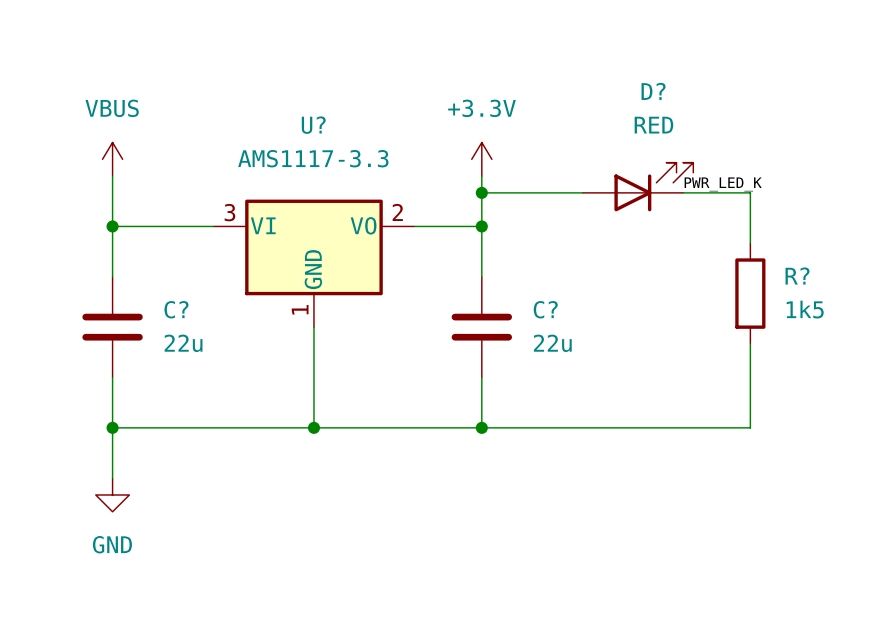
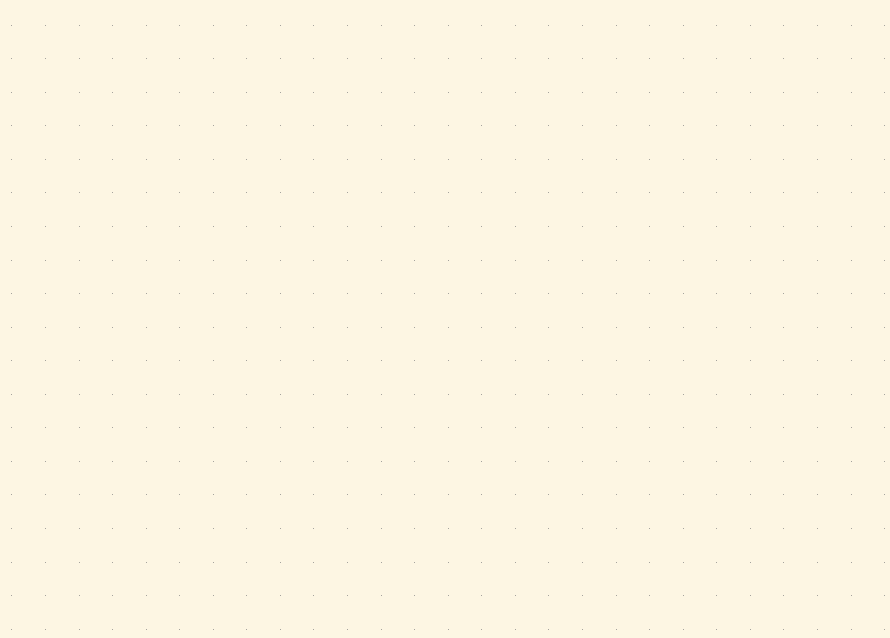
power symbol: VBUS (112, 159) -> none
power symbol: +3.3V (481, 159) -> none
wire: (112, 176) (112, 276) -> none
wire: (481, 176) (481, 276) -> none
label: PWR_LED_K (723, 184) -> none
D?: RED (637, 187) -> none
wire: (481, 192) (582, 192) -> none
junction: (481, 192) -> none
wire: (683, 192) (750, 192) (750, 243) -> none
wire: (112, 226) (213, 226) -> none
junction: (112, 226) -> none
wire: (414, 226) (481, 226) -> none
junction: (481, 226) -> none
U?: AMS1117-3.3 (313, 263) -> none
R?: 1k5 (750, 293) -> none
C?: 22u (112, 327) -> none
wire: (313, 327) (313, 427) -> none
C?: 22u (481, 327) -> none
wire: (750, 343) (750, 427) (112, 427) -> none
wire: (112, 377) (112, 478) -> none
wire: (481, 377) (481, 427) -> none
junction: (112, 427) -> none
junction: (313, 427) -> none
junction: (481, 427) -> none
power symbol: GND (112, 494) -> none

